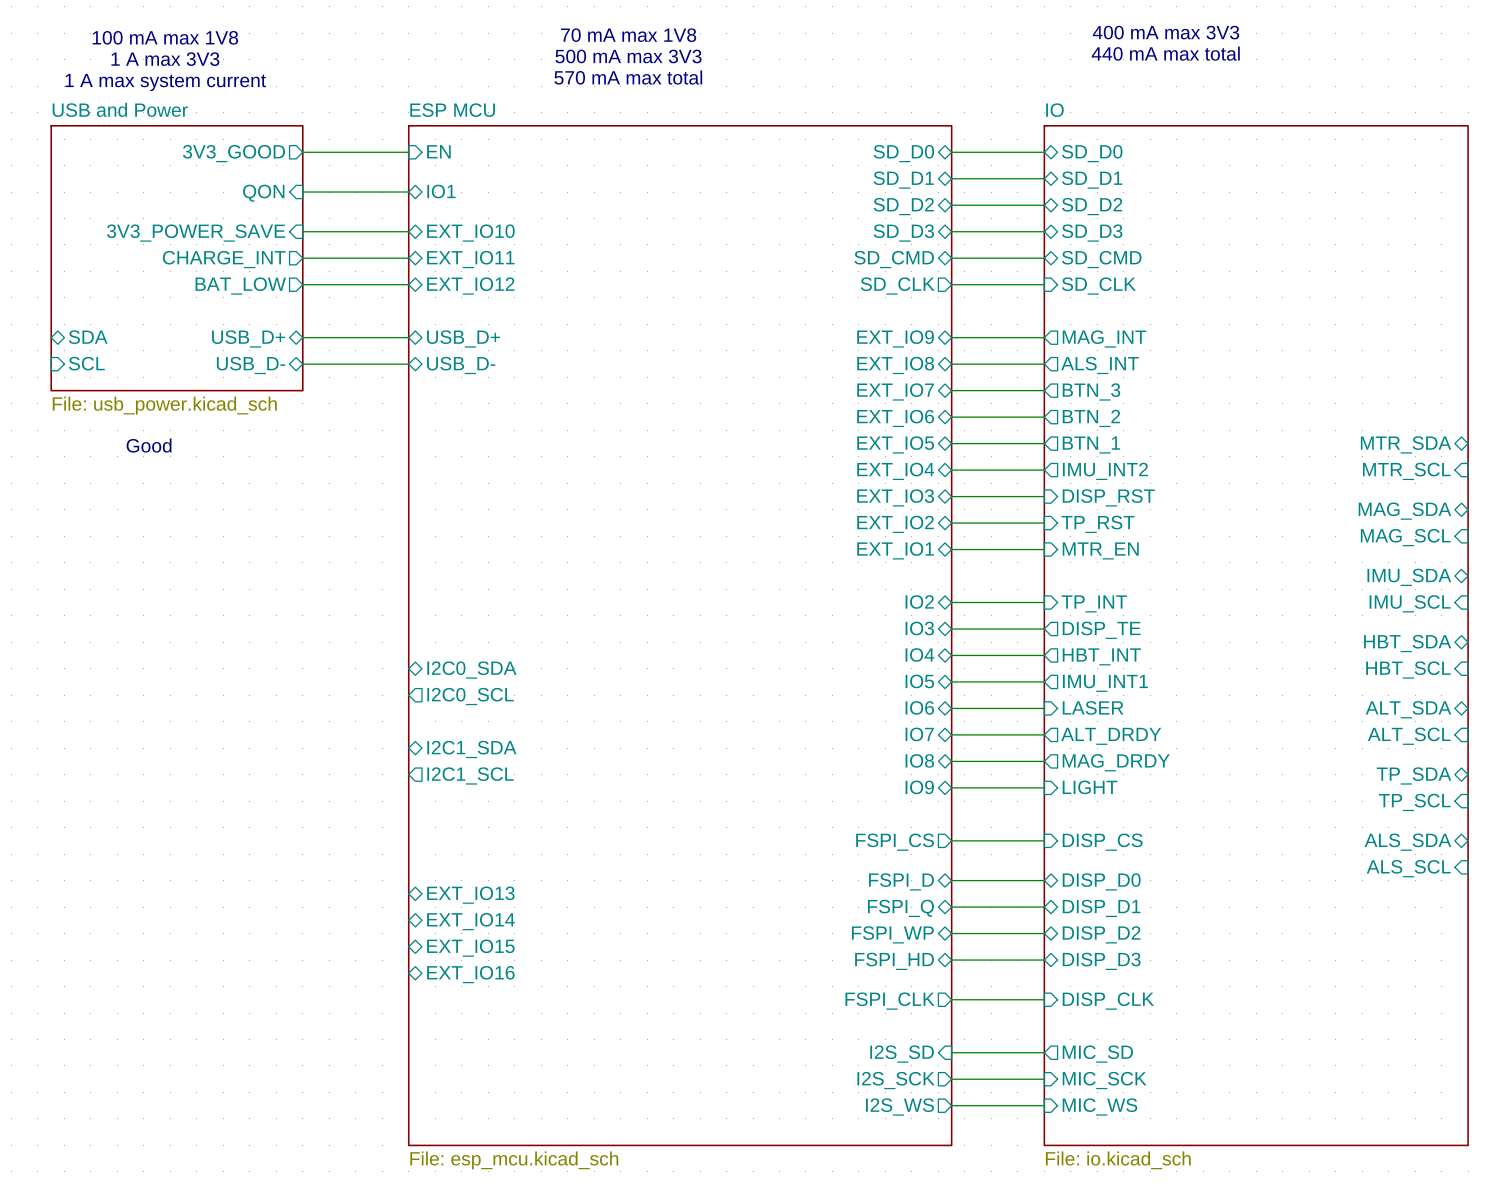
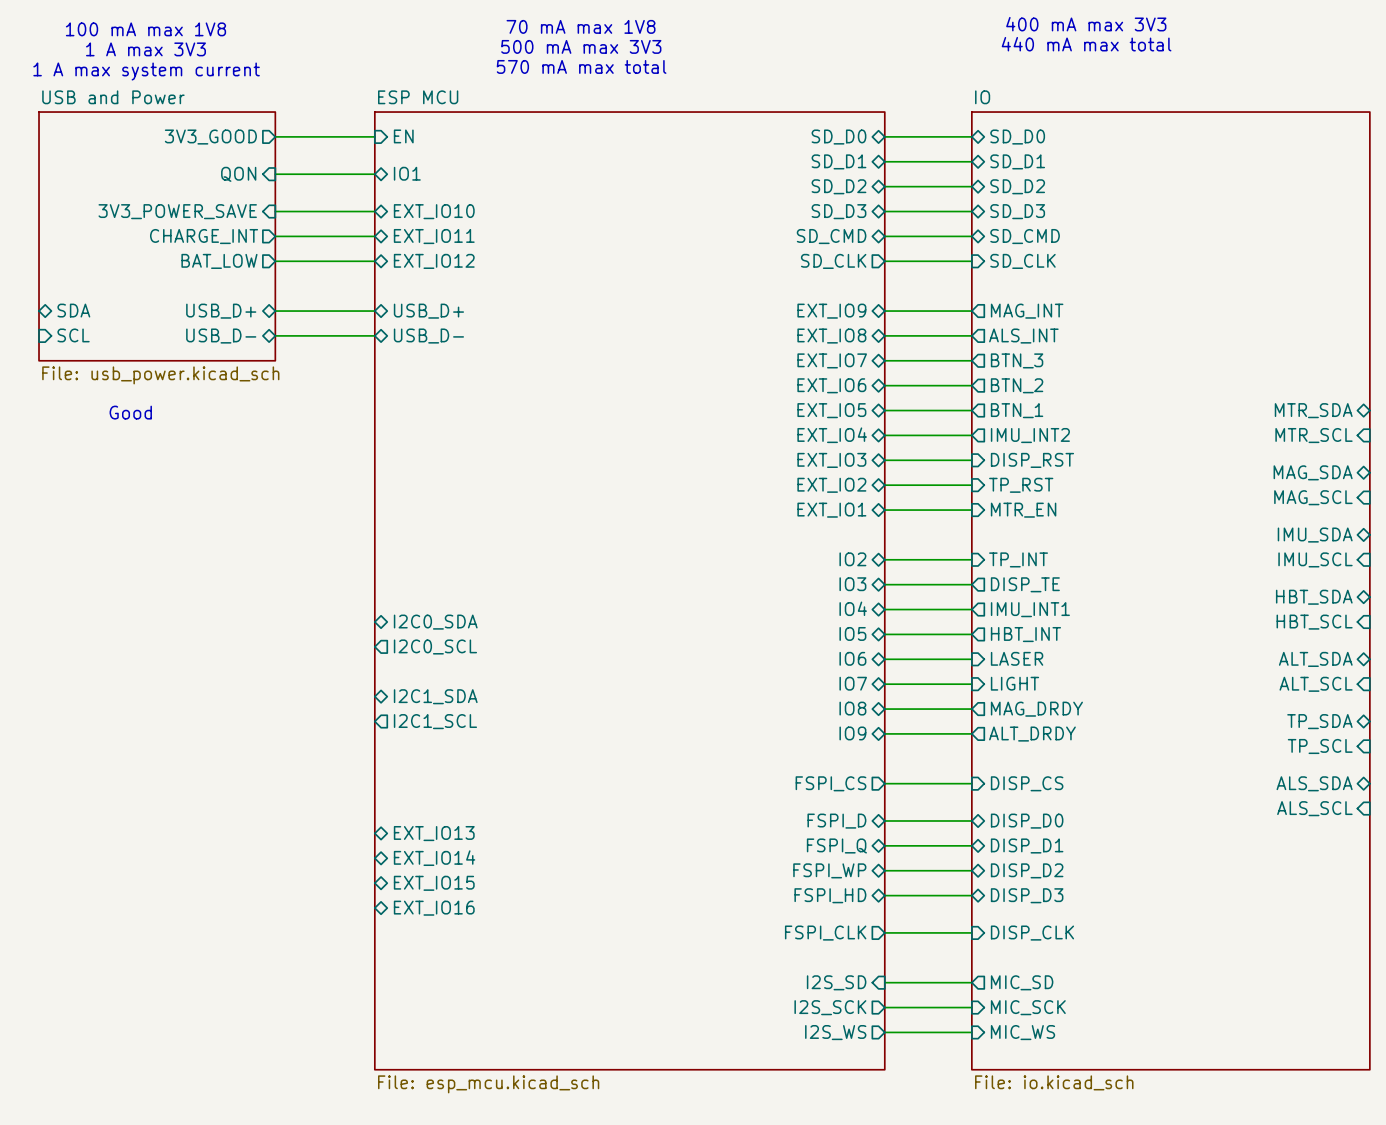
sheet pin: HBT_INT (1101, 656) -> IMU_INT1 (1030, 609)
sheet pin: IMU_INT1 (1105, 683) -> HBT_INT (1025, 634)
sheet pin shape: output (1111, 736) -> input (1014, 683)
sheet pin: ALT_DRDY (1111, 736) -> LIGHT (1014, 683)
sheet pin shape: input (1090, 787) -> output (1032, 734)
sheet pin: LIGHT (1090, 787) -> ALT_DRDY (1032, 734)

